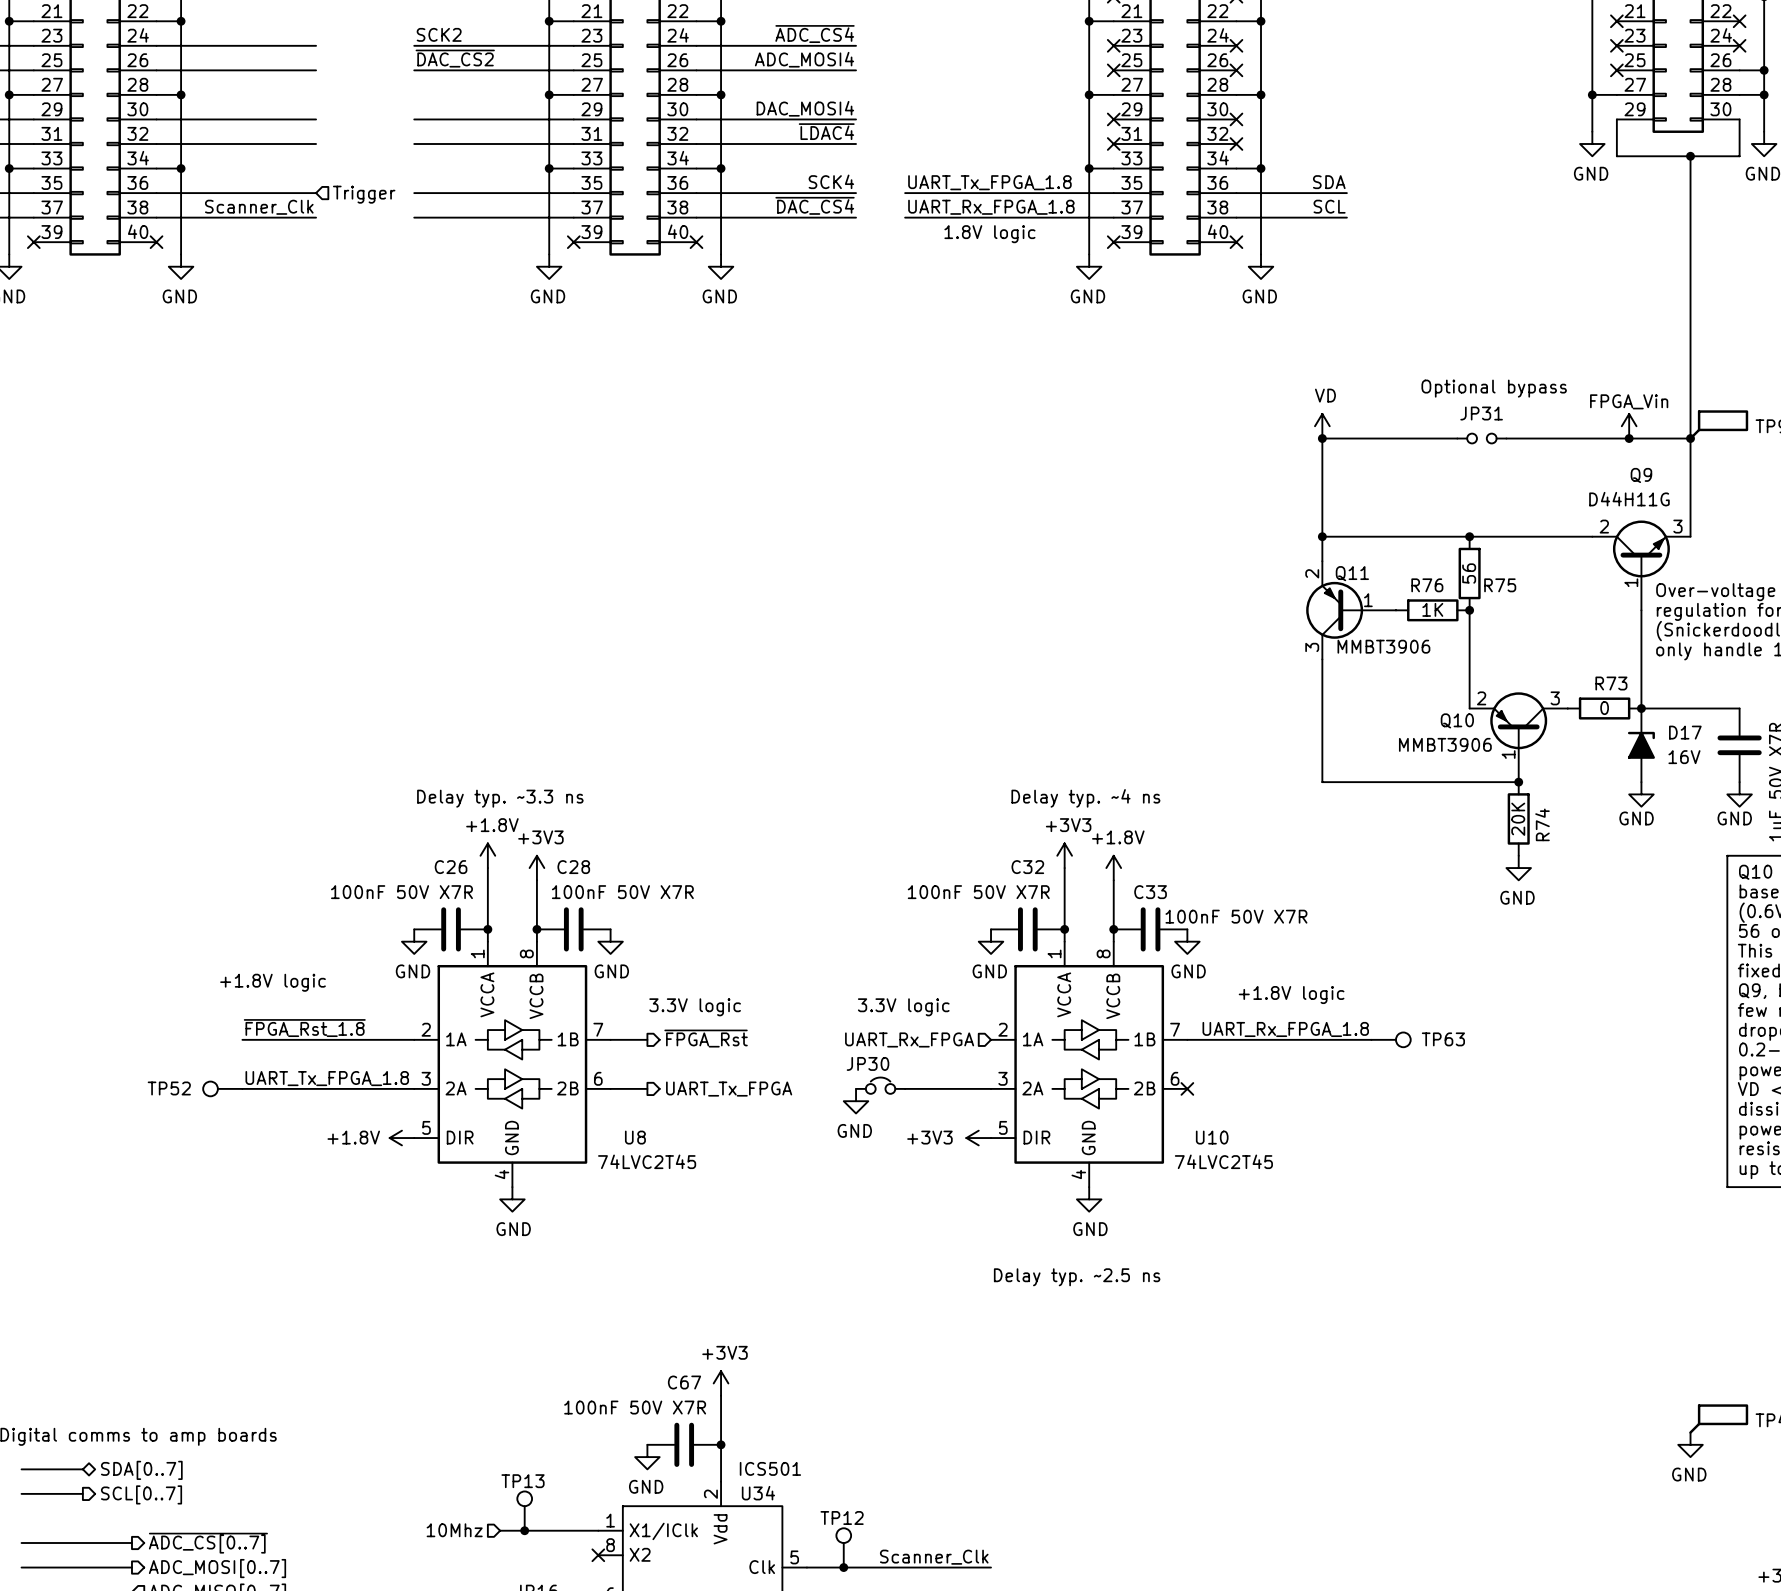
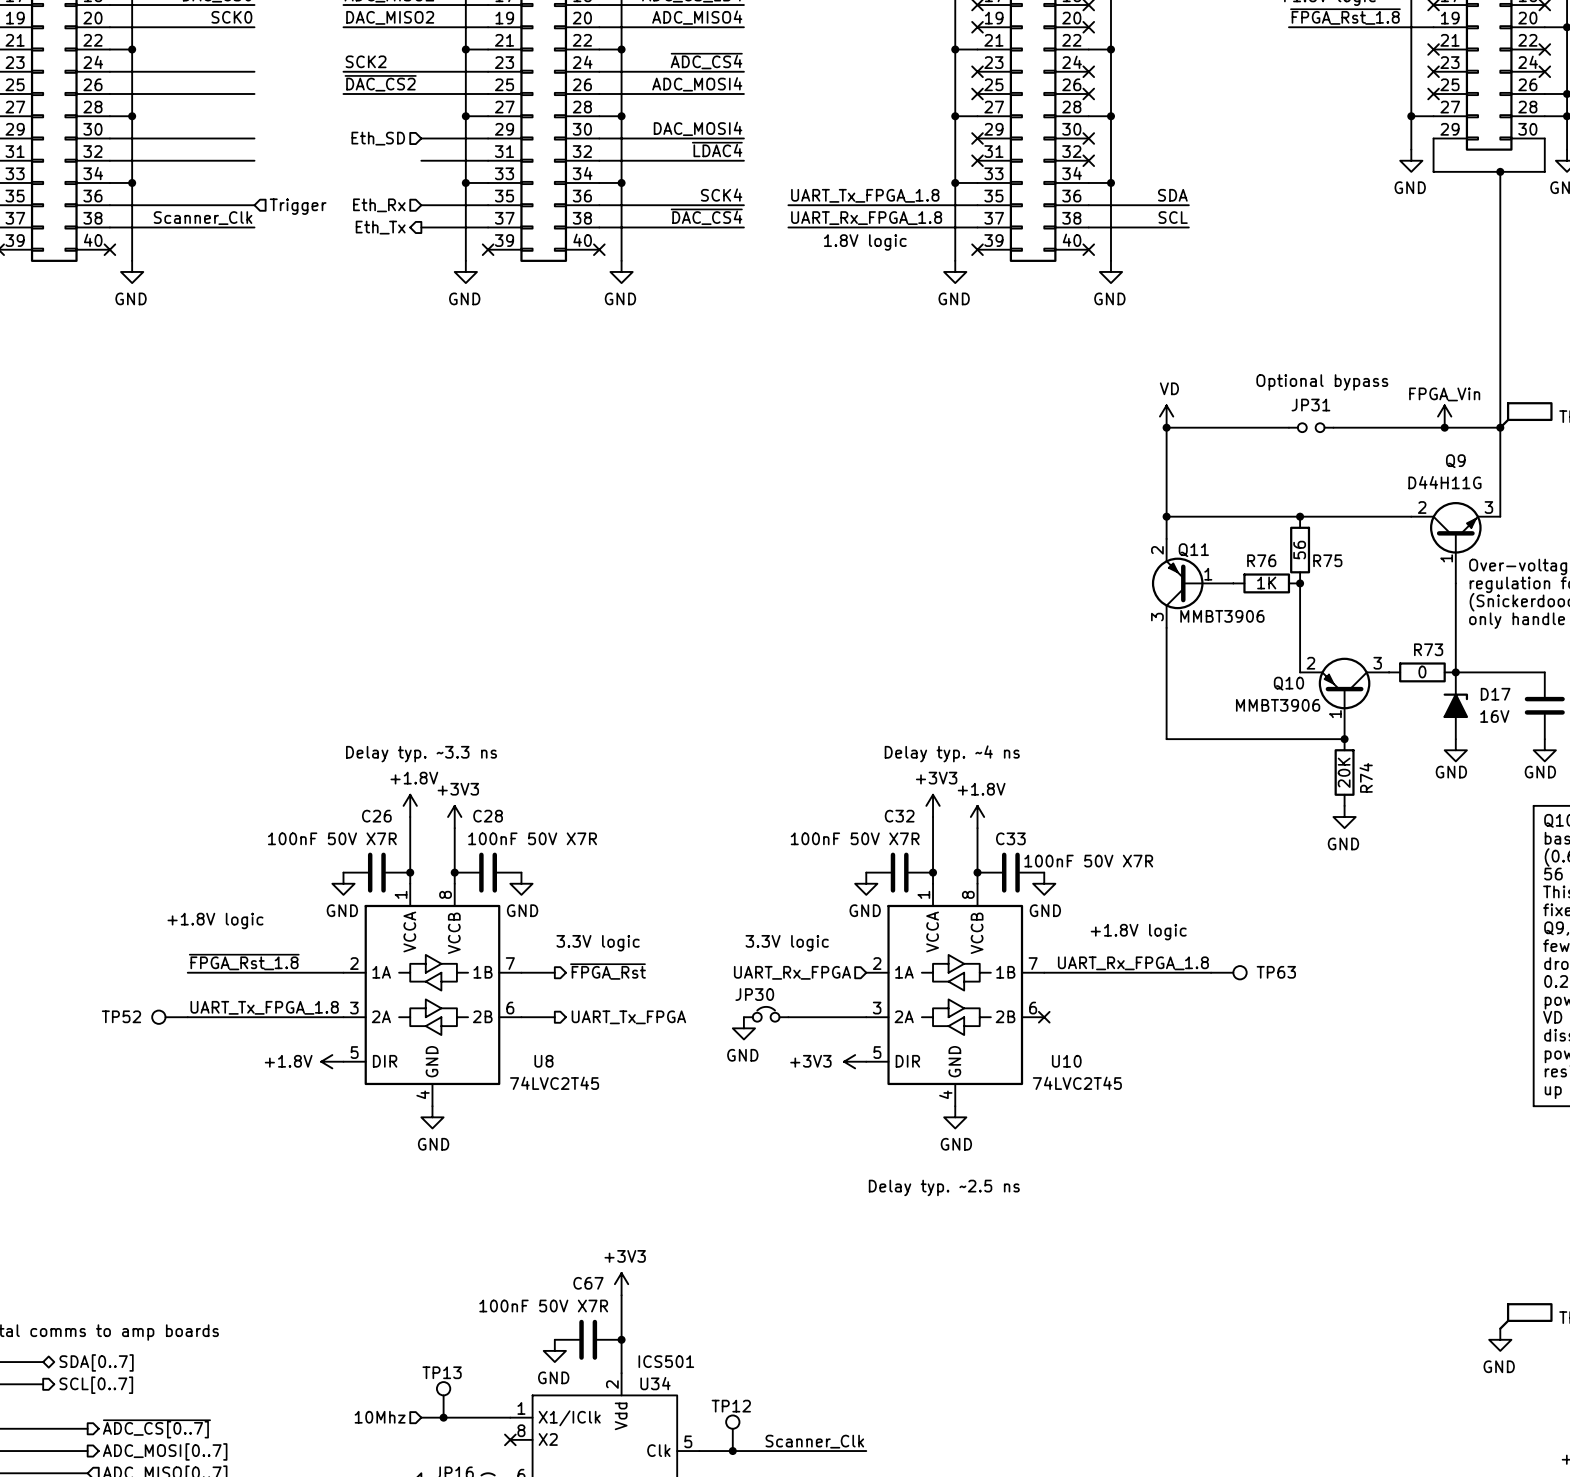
wire: (414, 119) (500, 119) -> none
hierarchical label: none -> Eth_SD (378, 138)
wire: (414, 144) (500, 144) -> none
wire: (414, 193) (500, 193) -> none
hierarchical label: none -> Eth_Rx (379, 205)
wire: (414, 217) (500, 217) -> none
hierarchical label: none -> Eth_Tx (380, 227)

